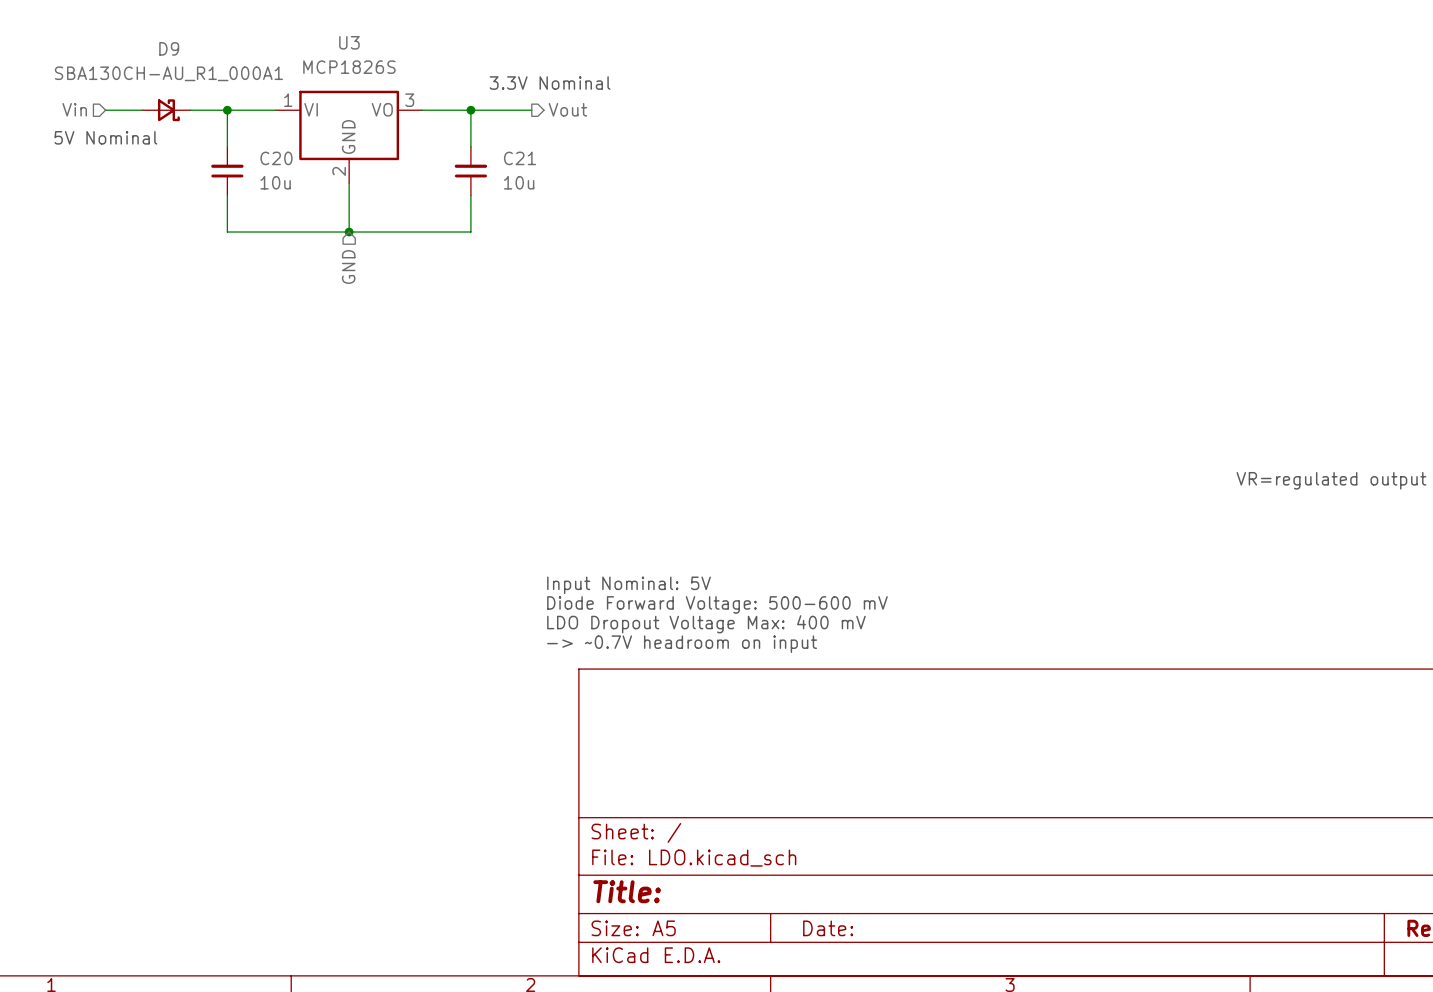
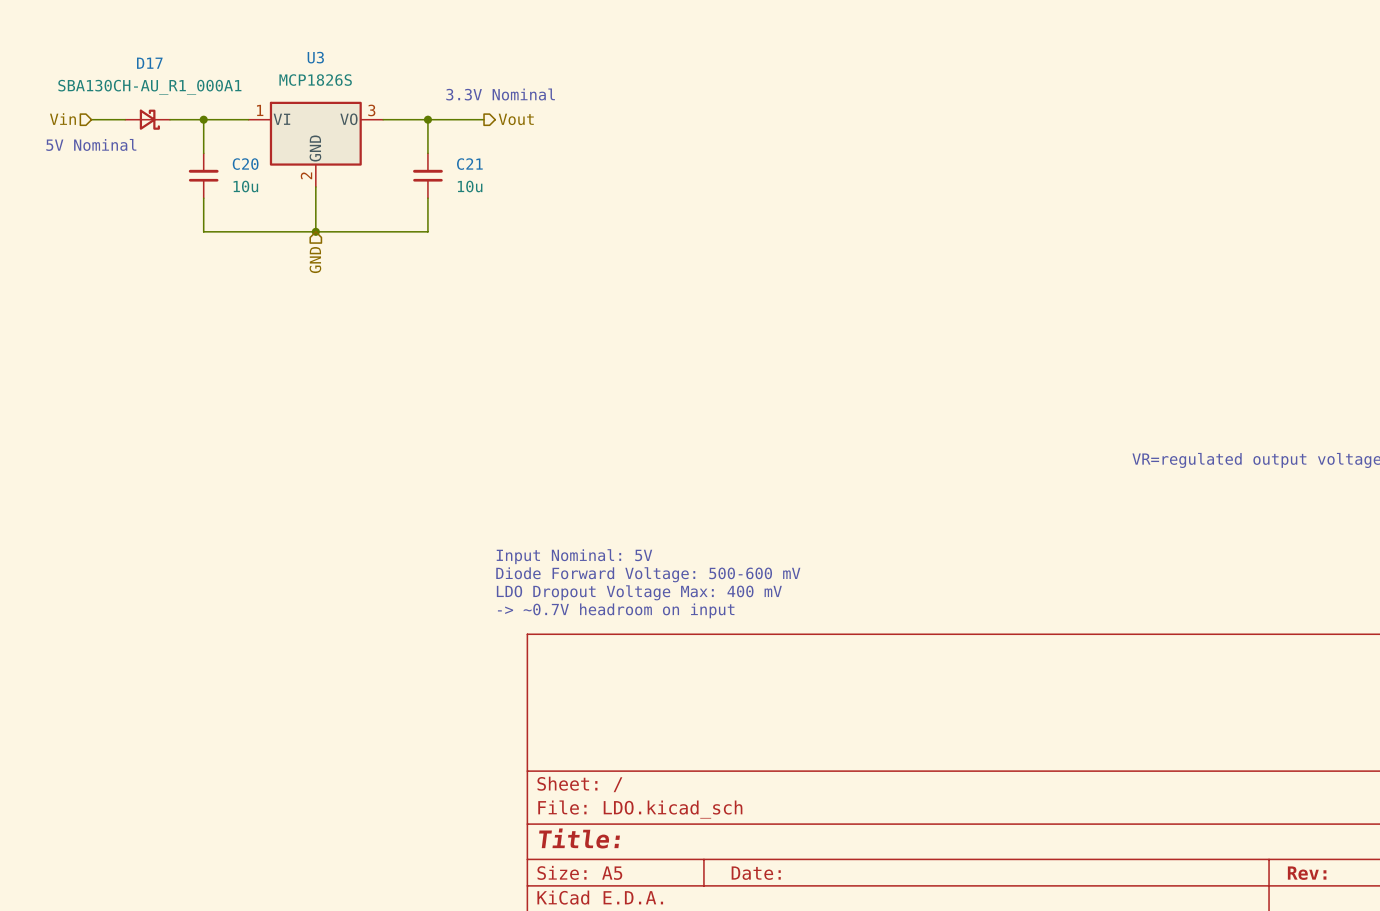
D9 name: D9 (169, 48) -> D17 (149, 63)

